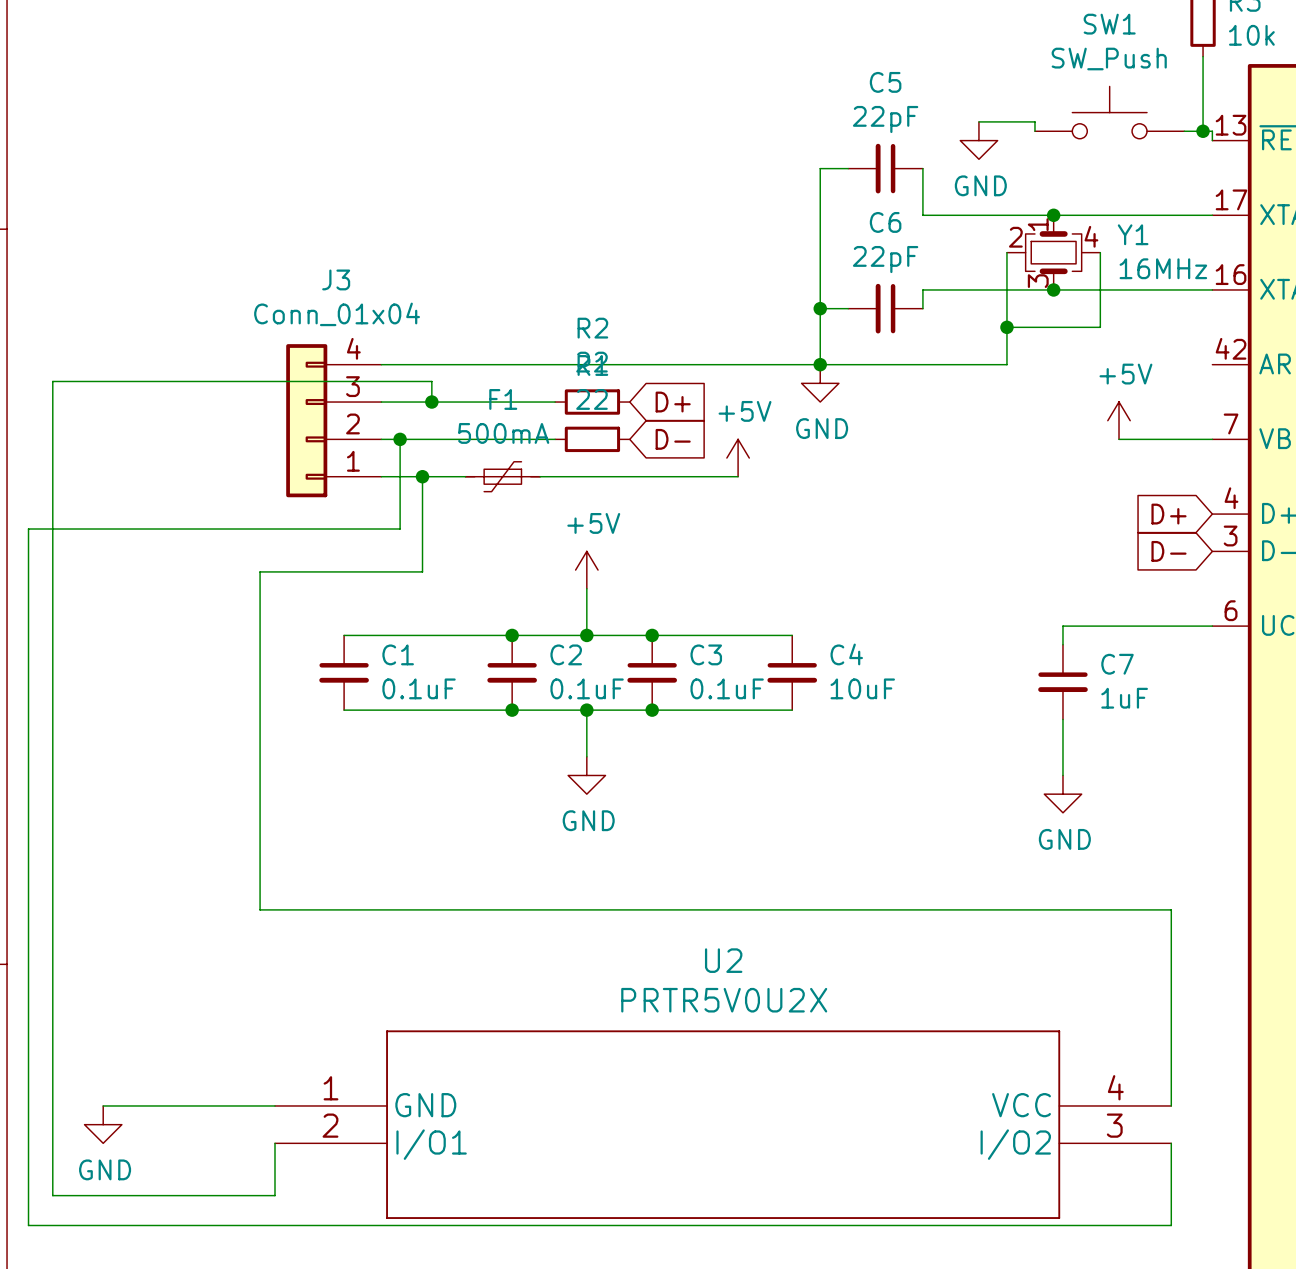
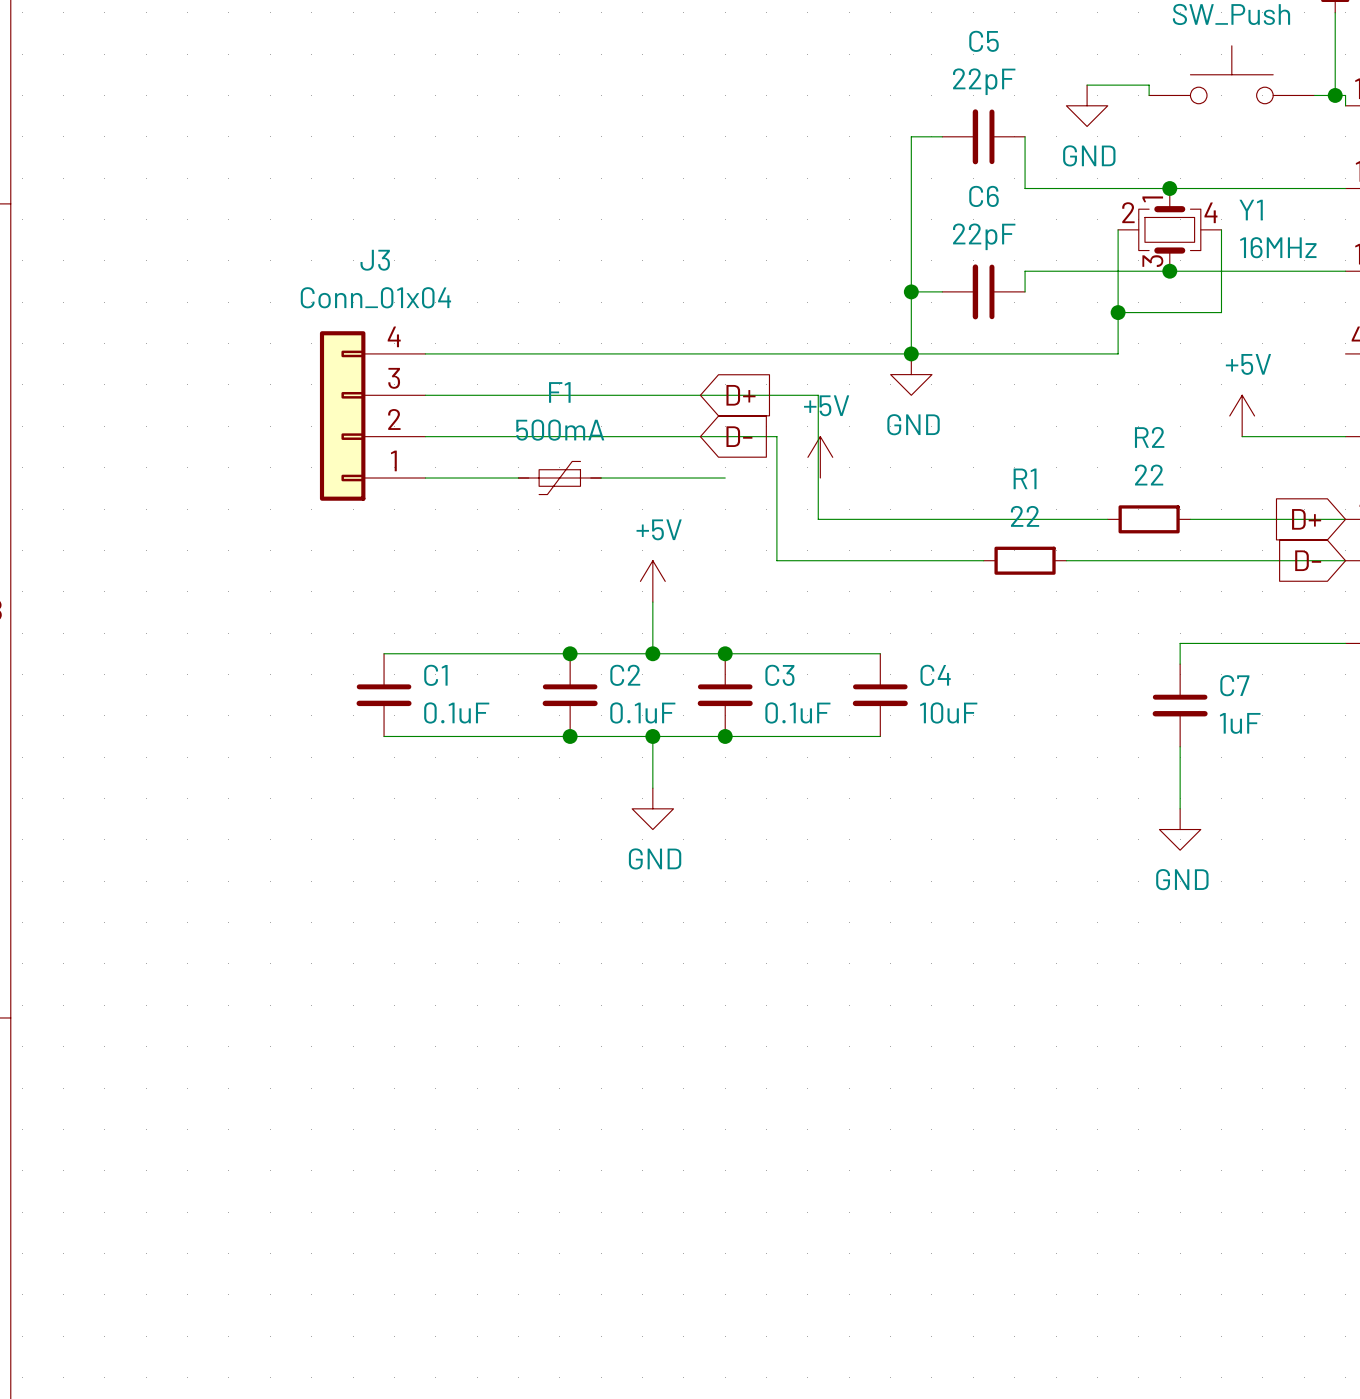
wire: (431, 402) (431, 381) (52, 381) (52, 1195) (274, 1195) (274, 1143) -> none
junction: (431, 402) -> none
wire: none -> (617, 395) (818, 395) (818, 519) (1107, 519)
R2 position: (592, 402) -> (1149, 519)
wire: (400, 439) (400, 529) (28, 529) (28, 1225) (1171, 1225) (1171, 1143) -> none
junction: (400, 439) -> none
wire: none -> (617, 436) (776, 436) (776, 560) (983, 560)
R1 position: (592, 439) -> (1025, 560)
wire: (422, 476) (422, 571) (260, 571) (260, 909) (1171, 909) (1171, 1105) -> none
junction: (422, 476) -> none
wire: (652, 476) (738, 476) -> none
wire: none -> (1190, 519) (1345, 519)
wire: none -> (1066, 560) (1345, 560)
wire: (103, 1105) (274, 1105) -> none
power symbol: GND (103, 1124) -> none
U2: PRTR5V0U2X (723, 1124) -> none

